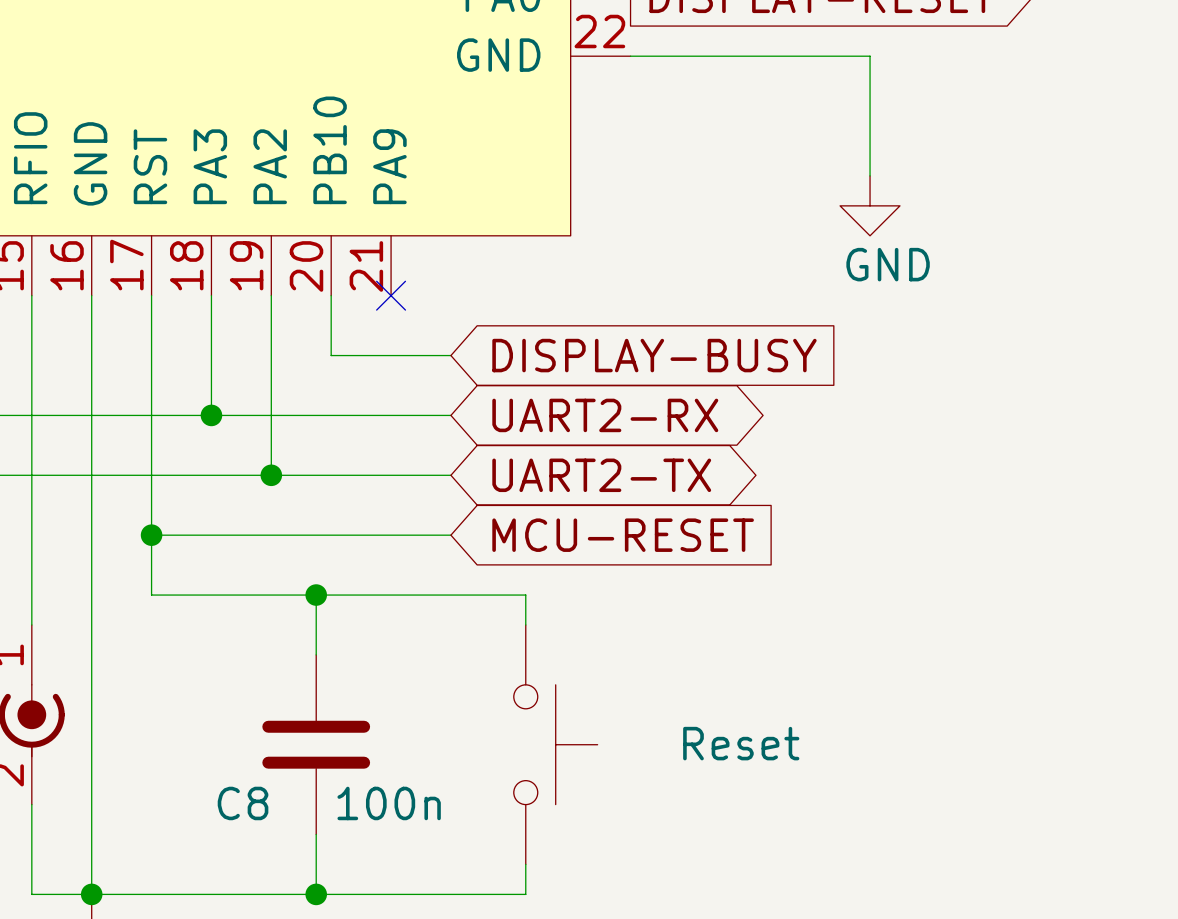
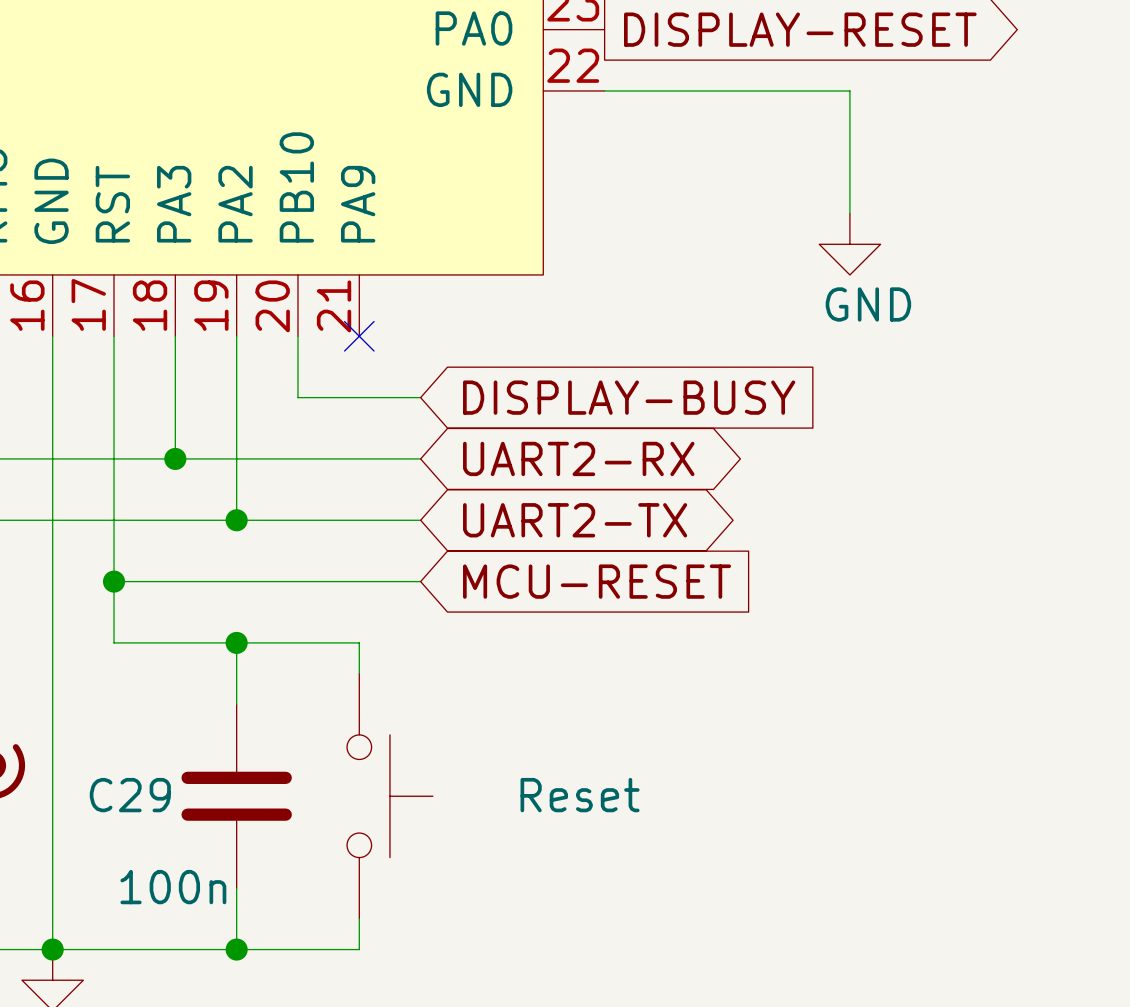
wire: (316, 595) (316, 654) -> (236, 642) (236, 704)
junction position: (316, 595) -> (236, 642)
wire: (391, 595) (525, 595) (525, 624) -> (359, 642) (359, 673)
C29: none -> 100n (236, 796)
C8: 100n (316, 744) -> none
part position: (555, 744) -> (389, 796)
wire: (316, 834) (316, 894) -> (236, 888) (236, 949)
wire: (525, 864) (525, 894) (391, 894) -> (359, 918) (359, 949)
junction position: (316, 894) -> (236, 949)

